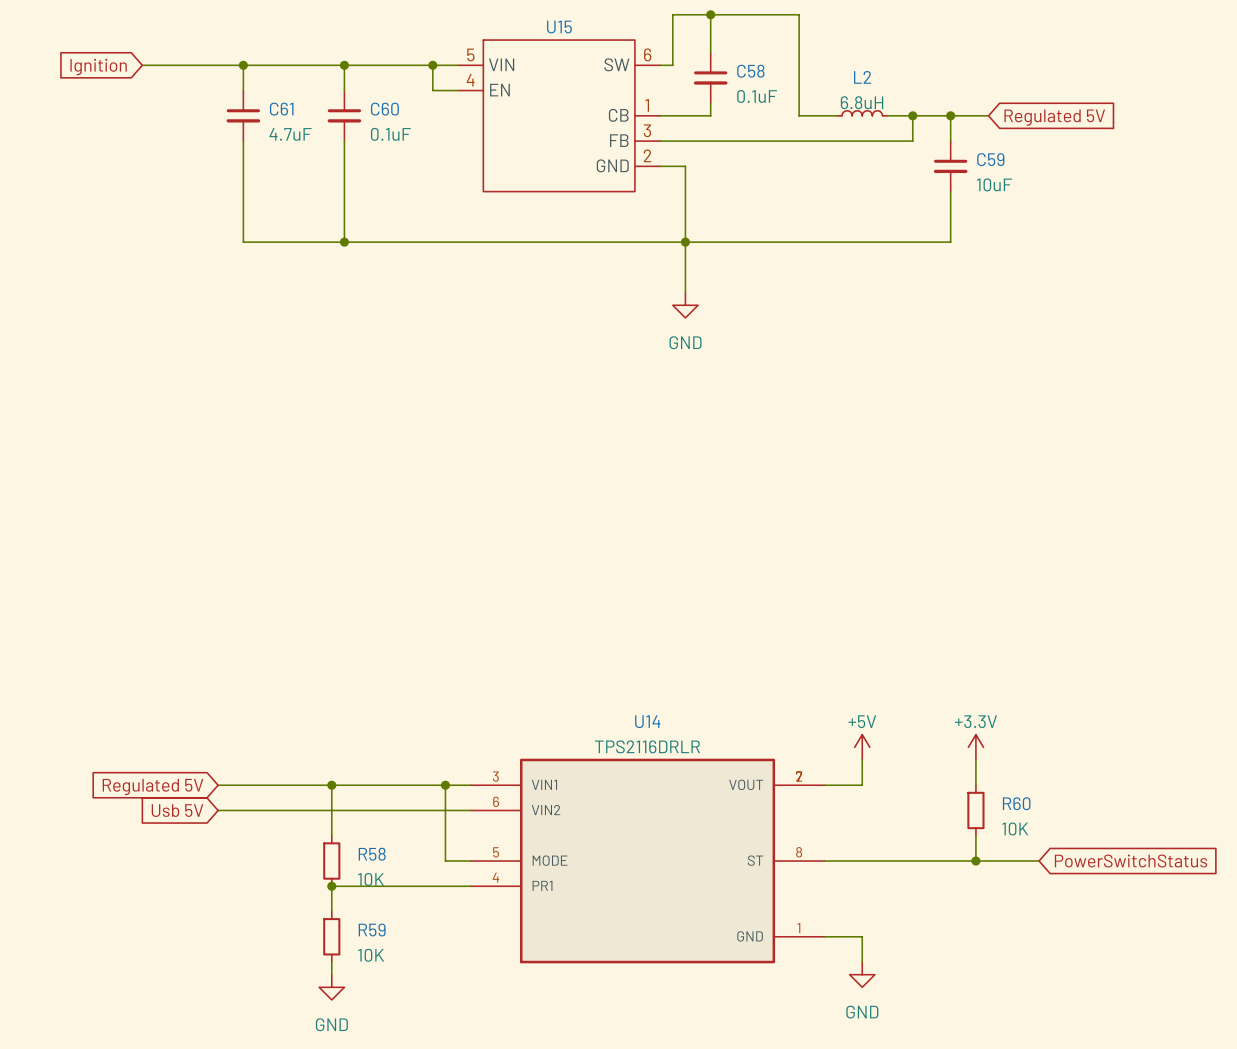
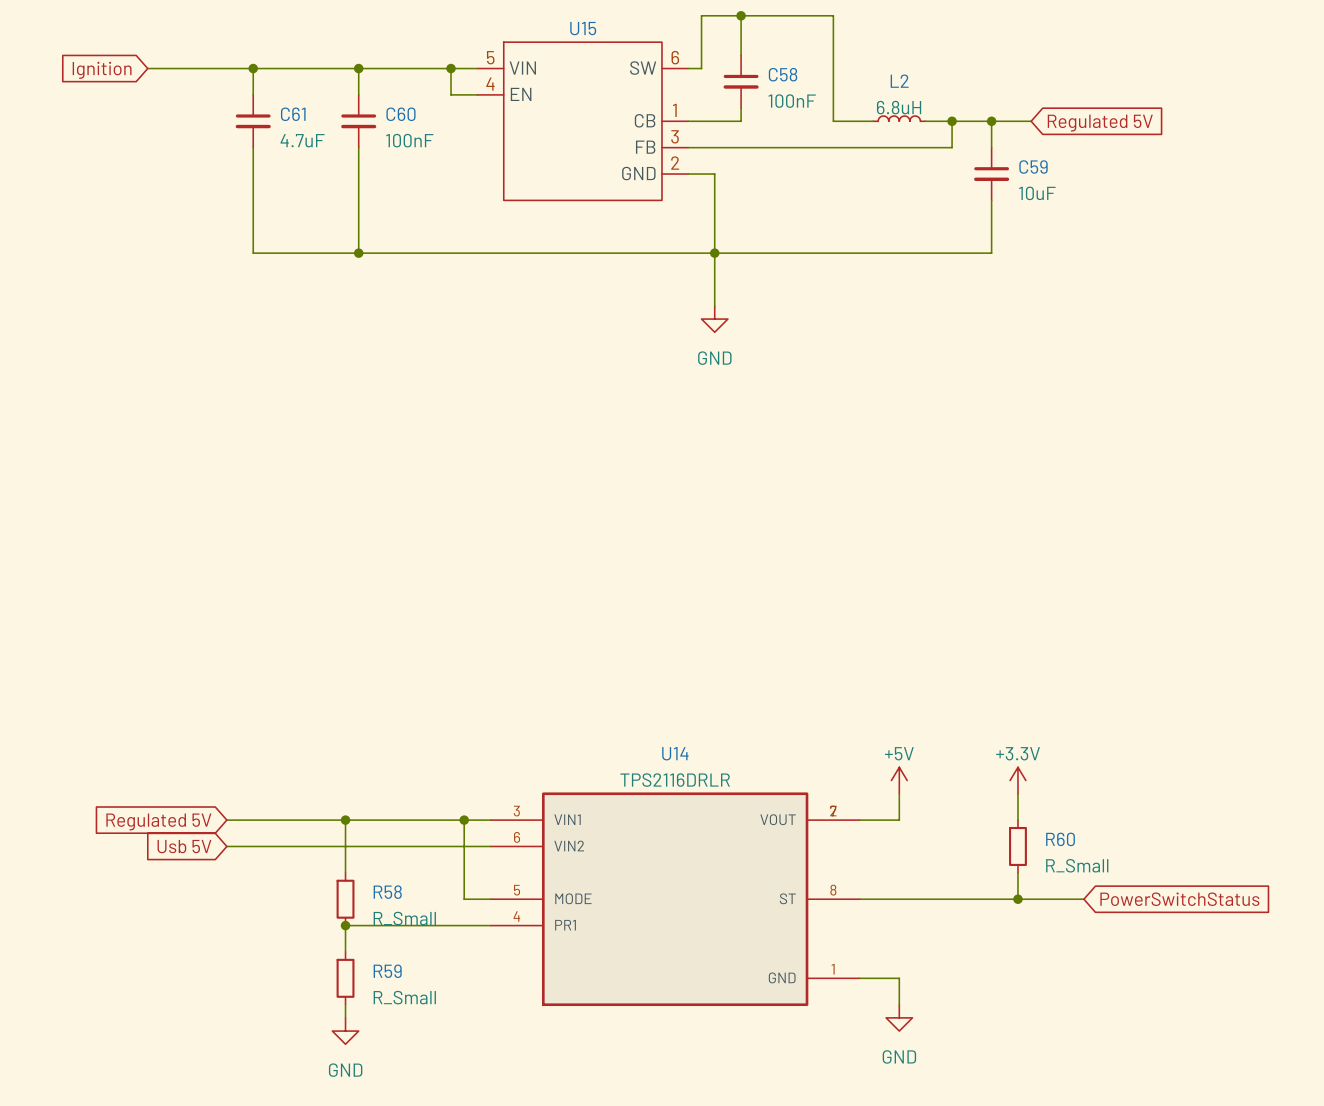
C58 value: 0.1uF (757, 96) -> 100nF (792, 101)
C60 value: 0.1uF (390, 134) -> 100nF (409, 140)
R60 value: 10K (1015, 828) -> R_Small (1077, 865)
R58 value: 10K (371, 879) -> R_Small (404, 918)
R59 value: 10K (371, 955) -> R_Small (404, 997)

